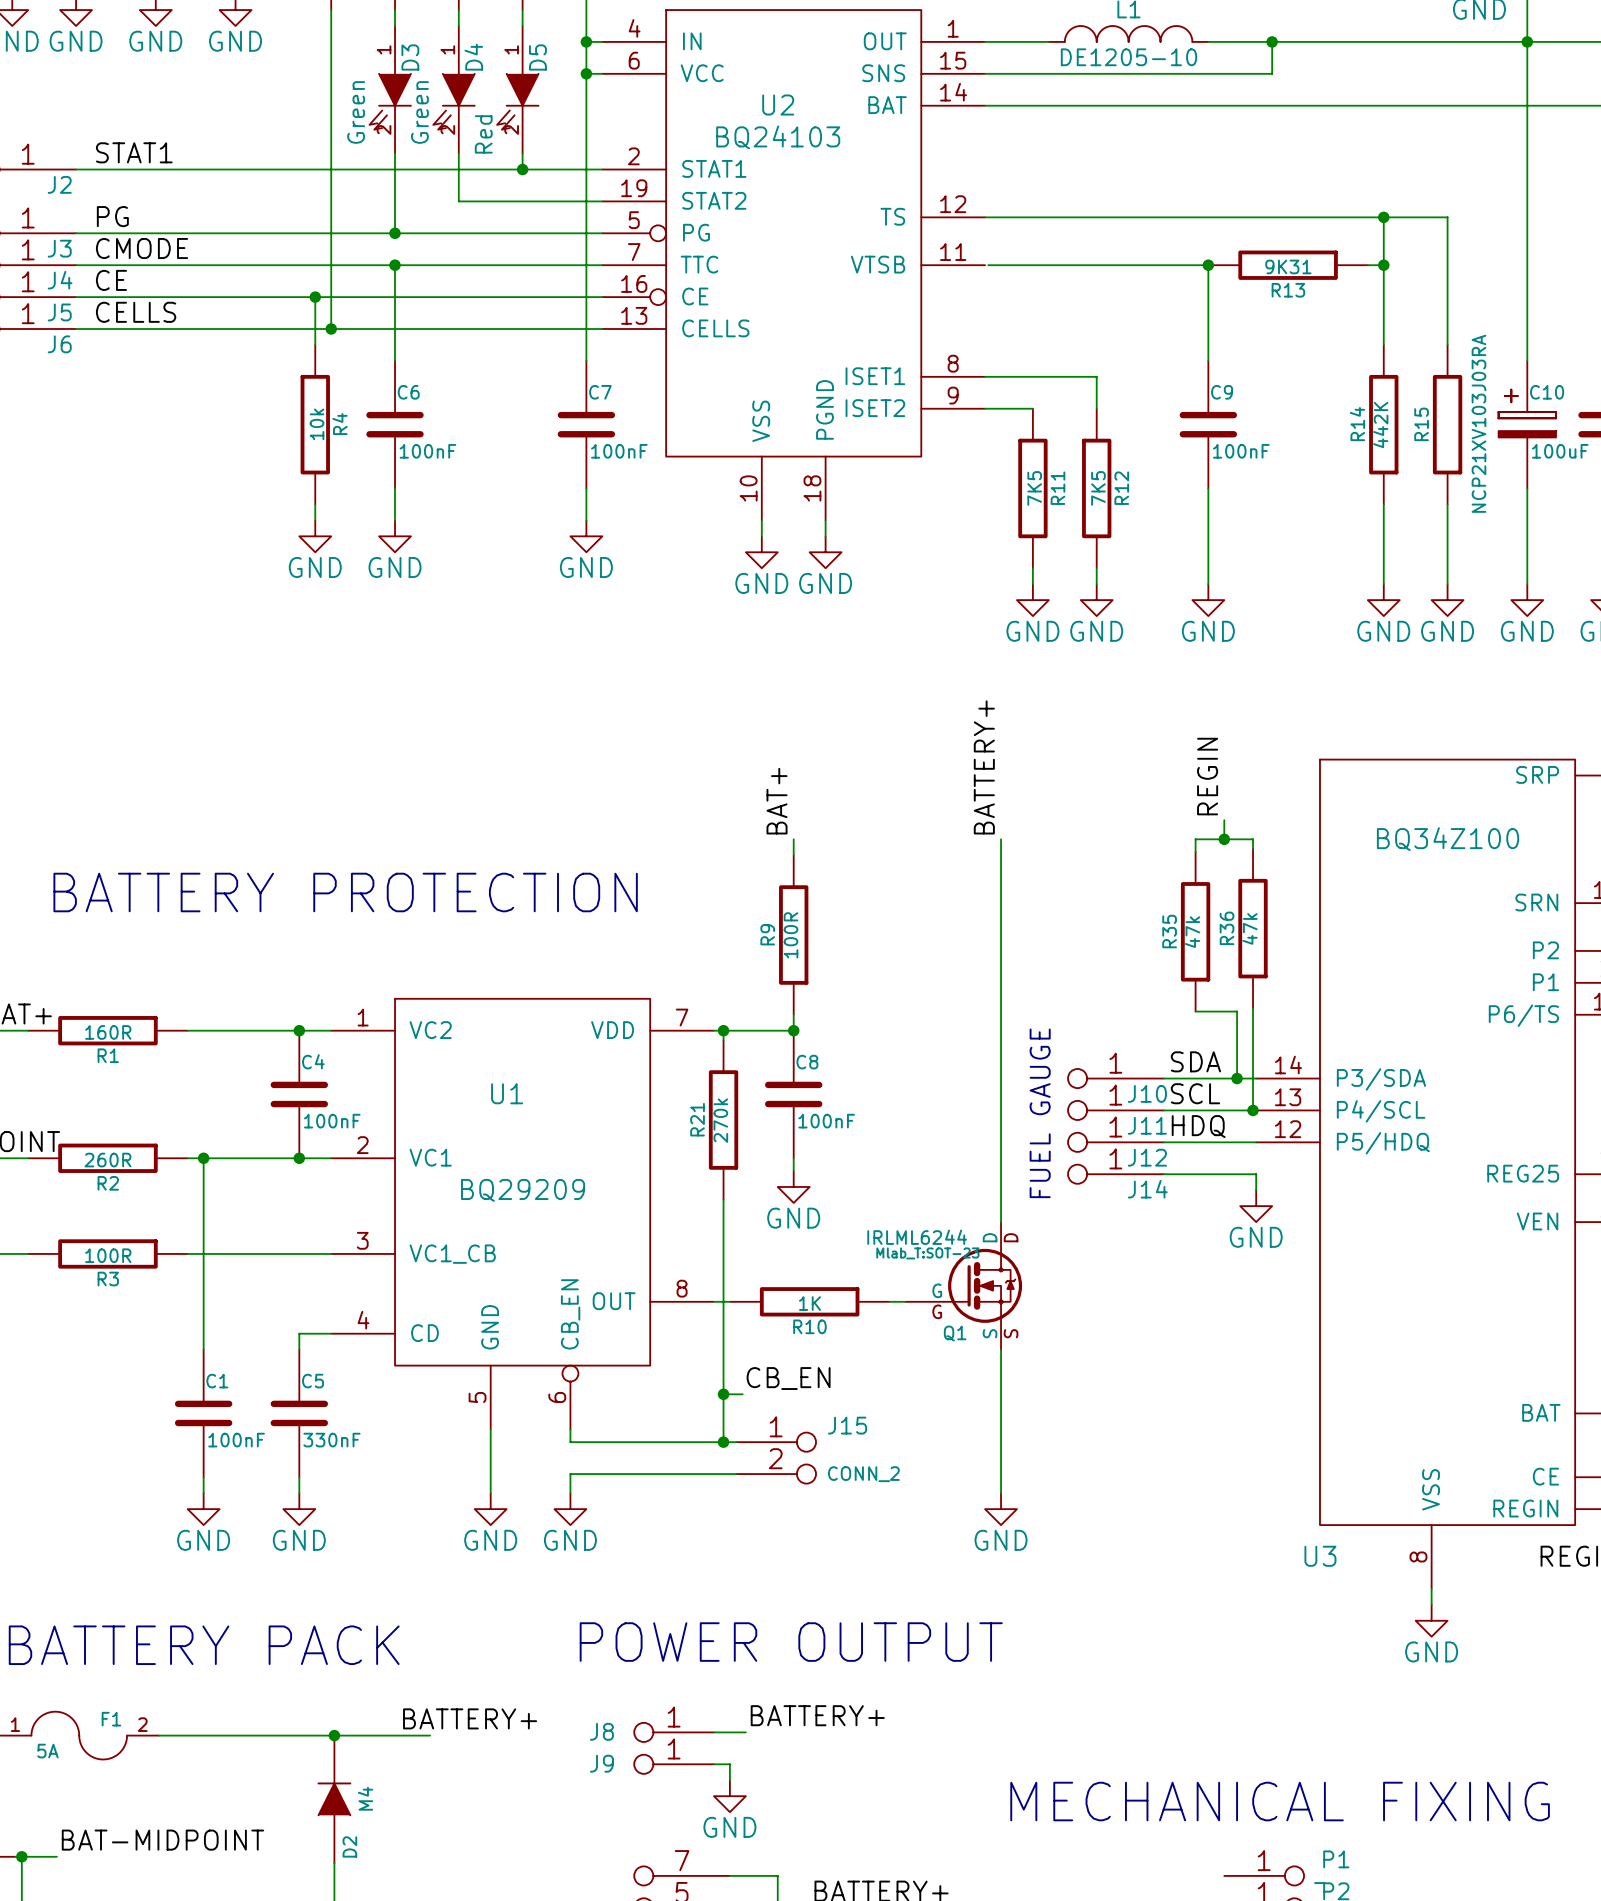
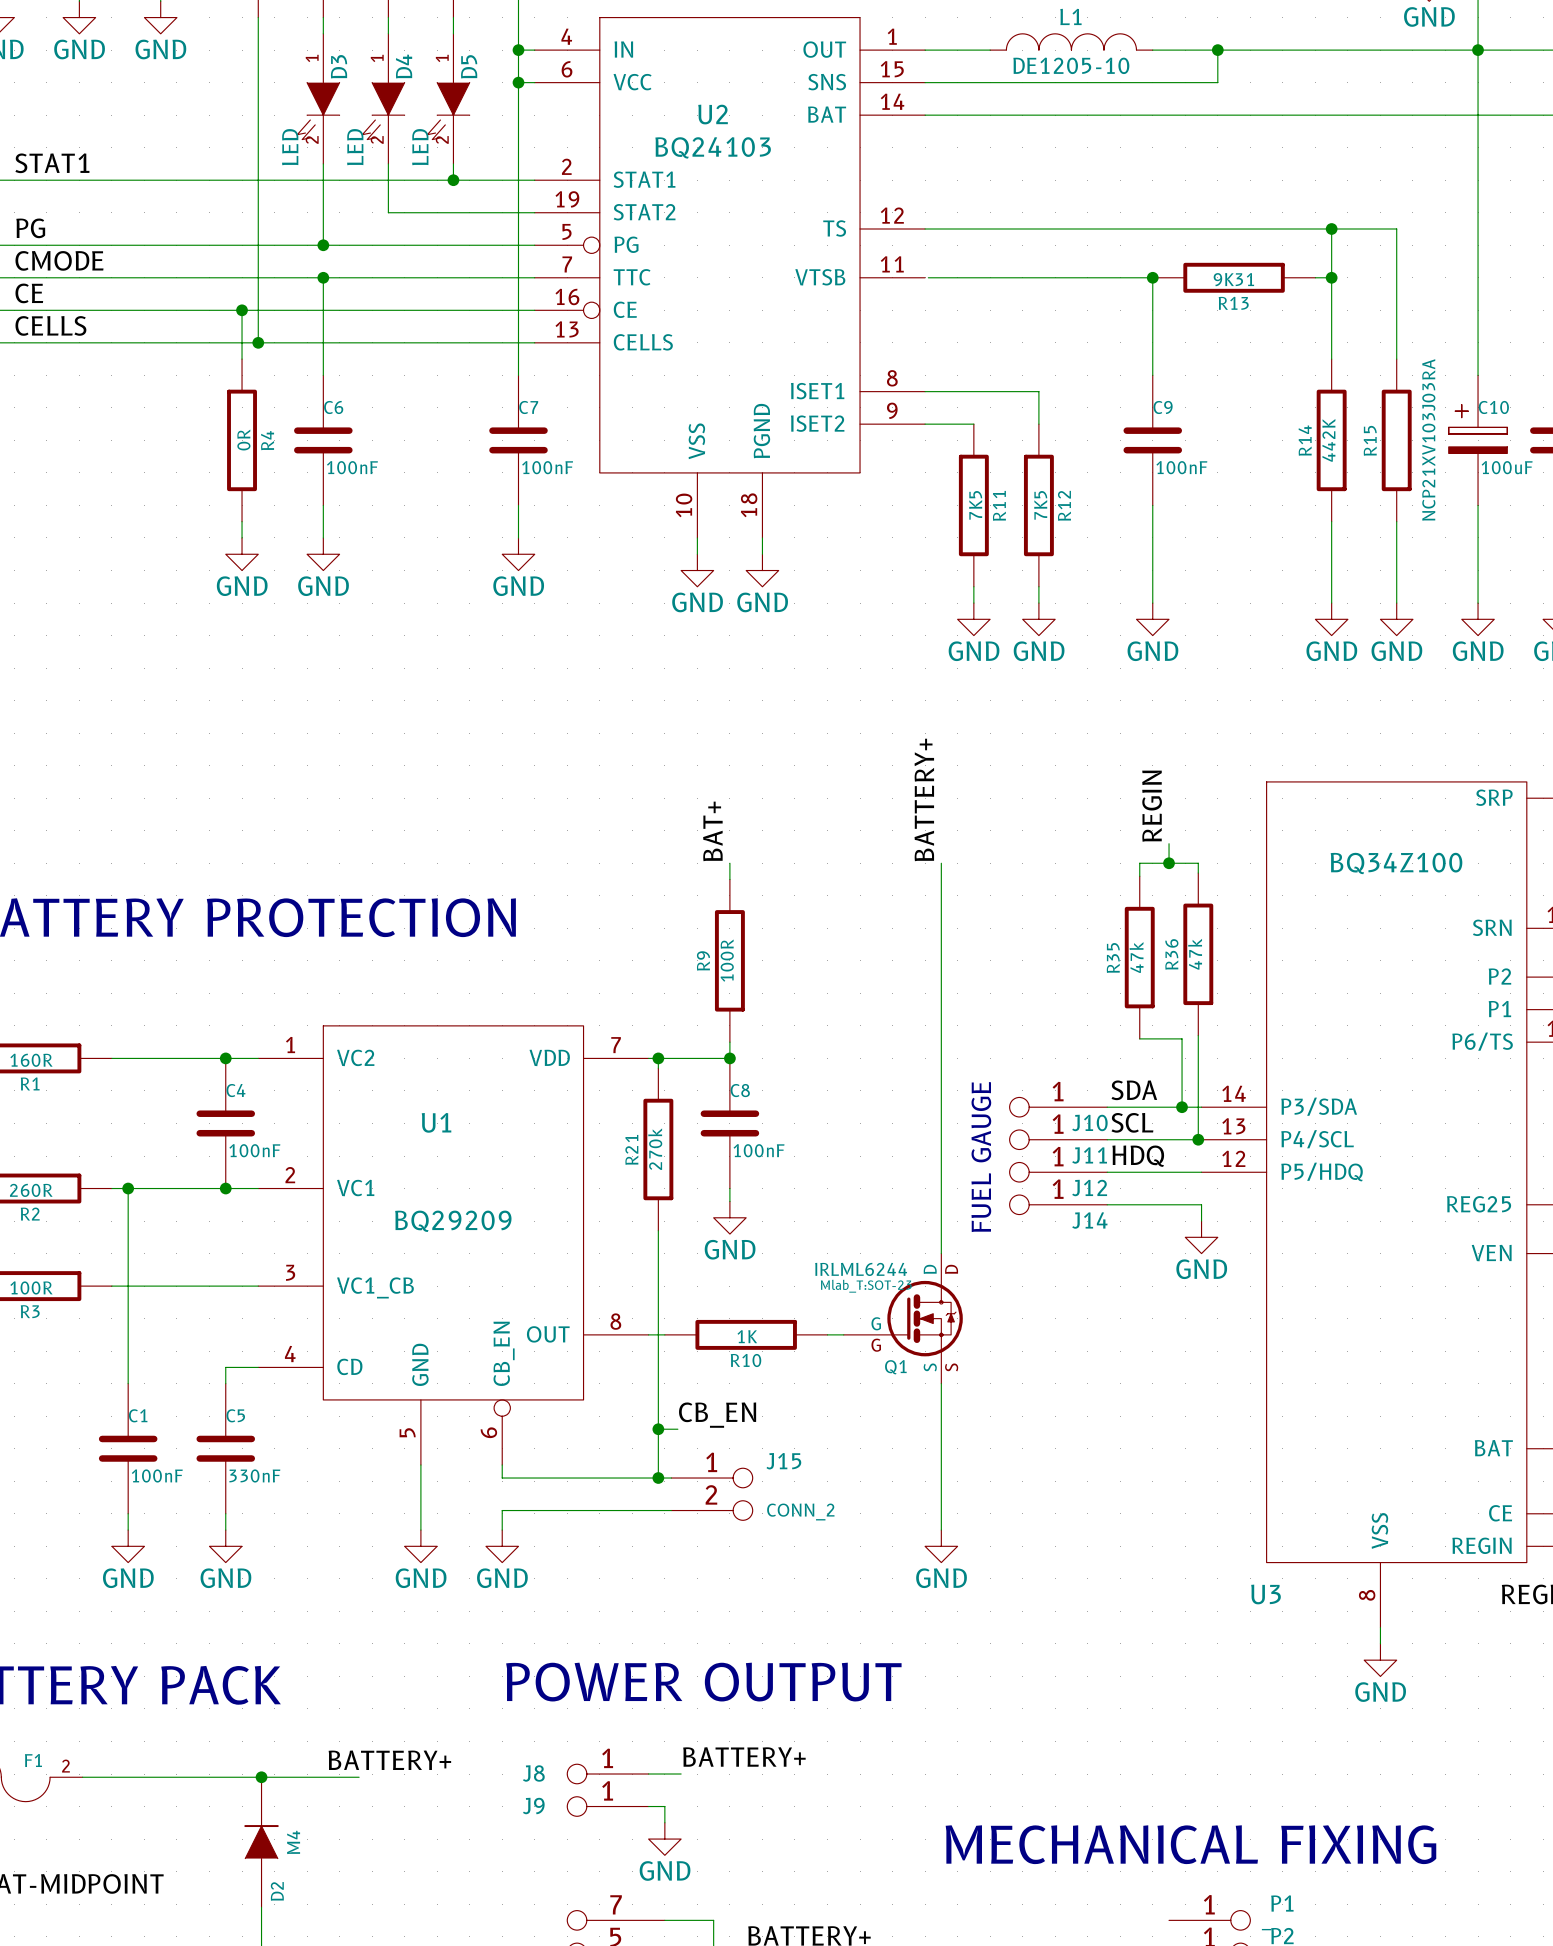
D3 value: Green (356, 112) -> LED (290, 147)
D4 value: Green (419, 112) -> LED (355, 147)
D5 value: Red (483, 134) -> LED (420, 147)
R4 value: 10k (317, 424) -> 0R (243, 439)

